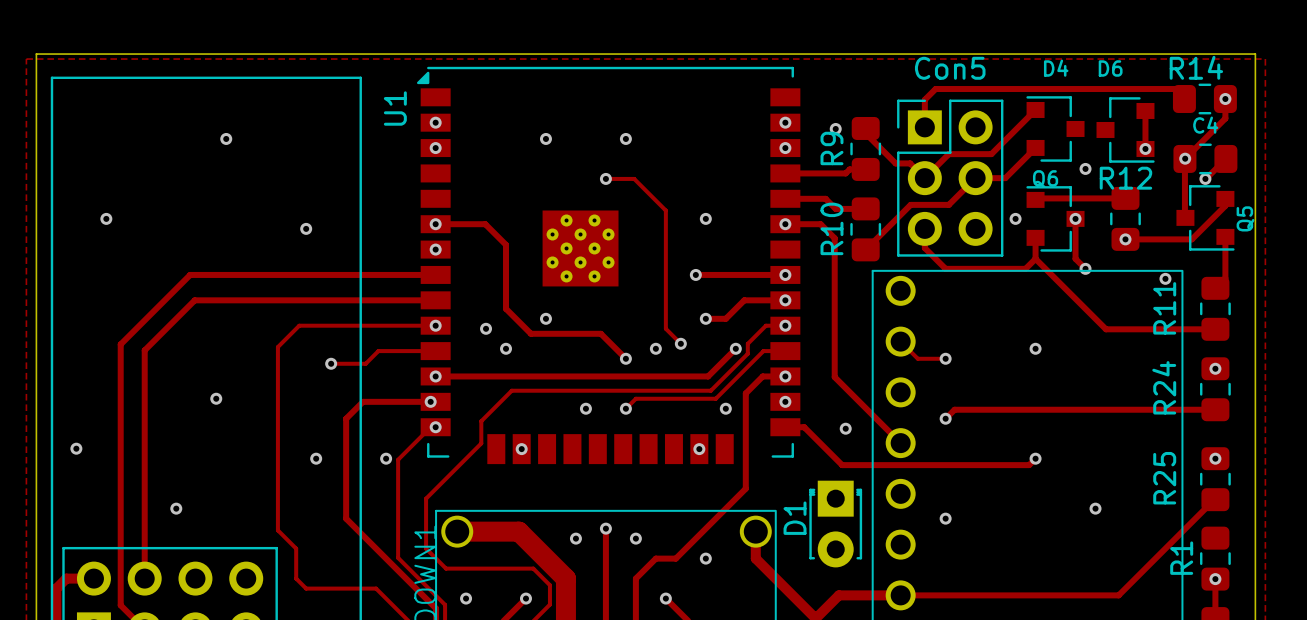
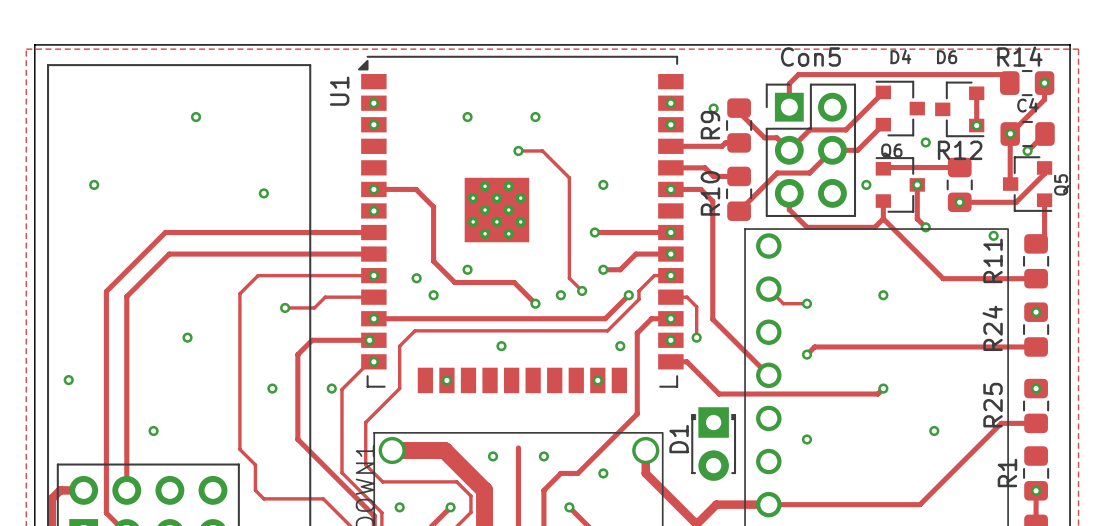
track: (785, 351) (763, 351) (715, 398) (635, 398) (625, 408) -> none
track: none -> (675, 297) (686, 297) (696, 306) (696, 337)
track: (511, 390) (481, 421) (481, 443) (466, 458) -> (438, 330) (414, 330) (399, 346) (399, 388)
via: (625, 408) -> none
via position: (845, 428) -> (696, 337)
track: (1214, 499) (1118, 595) (1078, 595) -> (1035, 423) (1001, 423) (920, 504)
via: (605, 528) -> none

